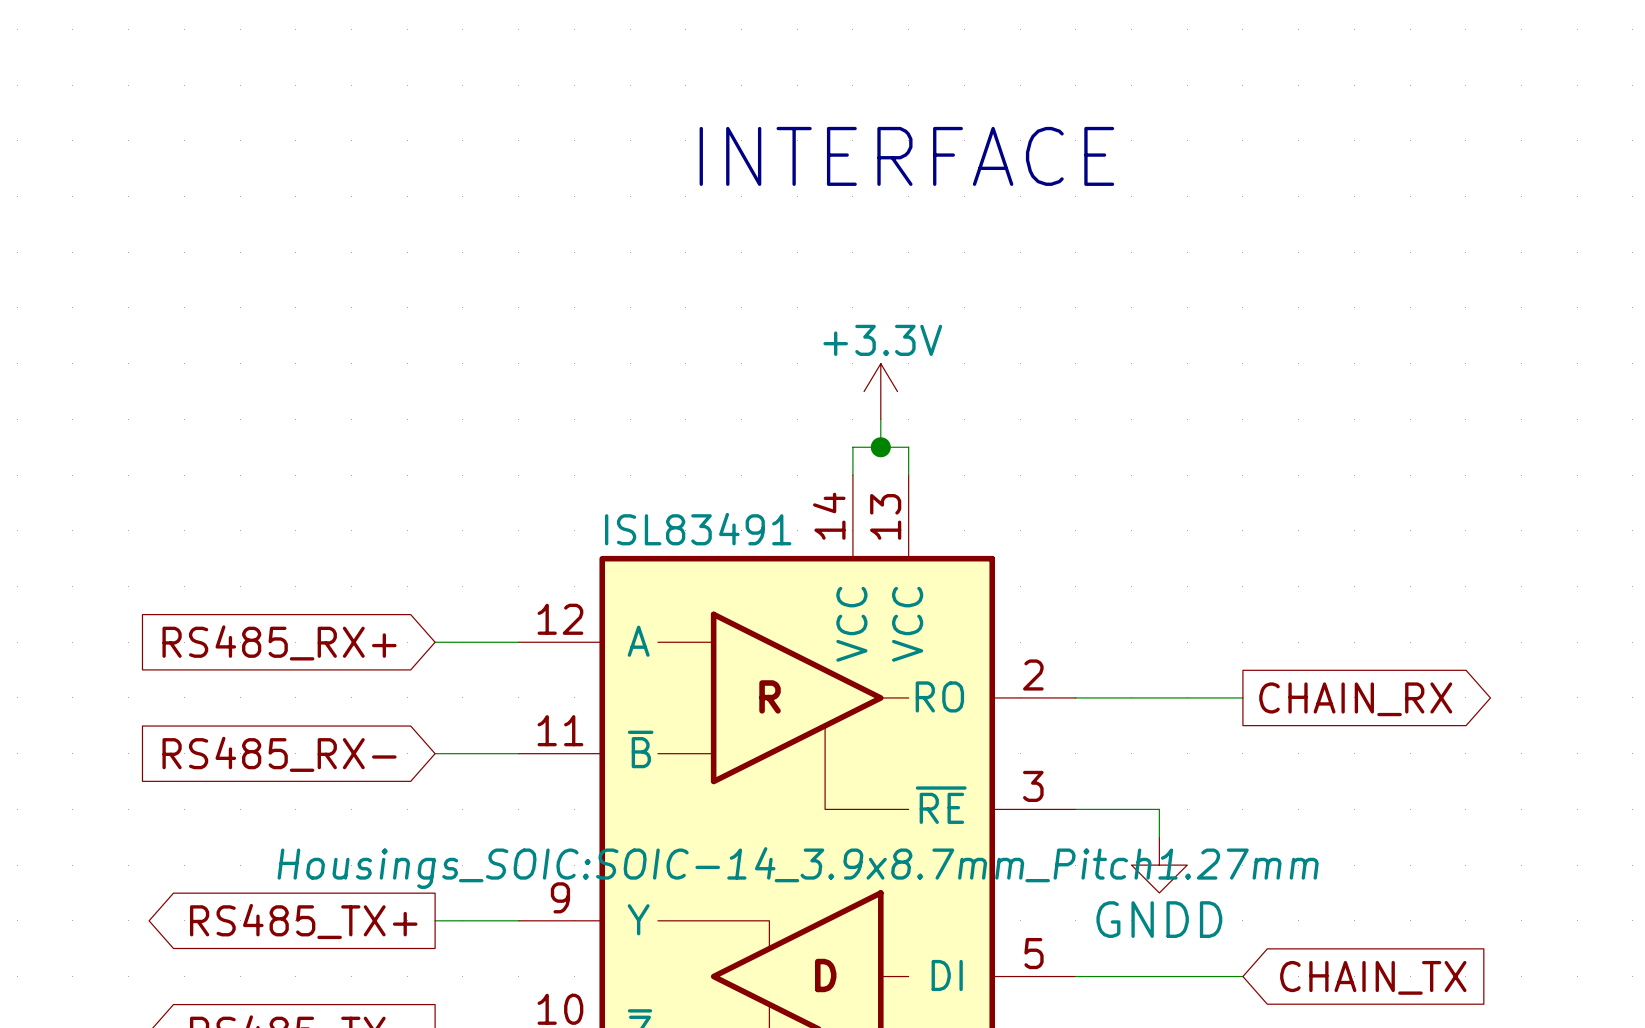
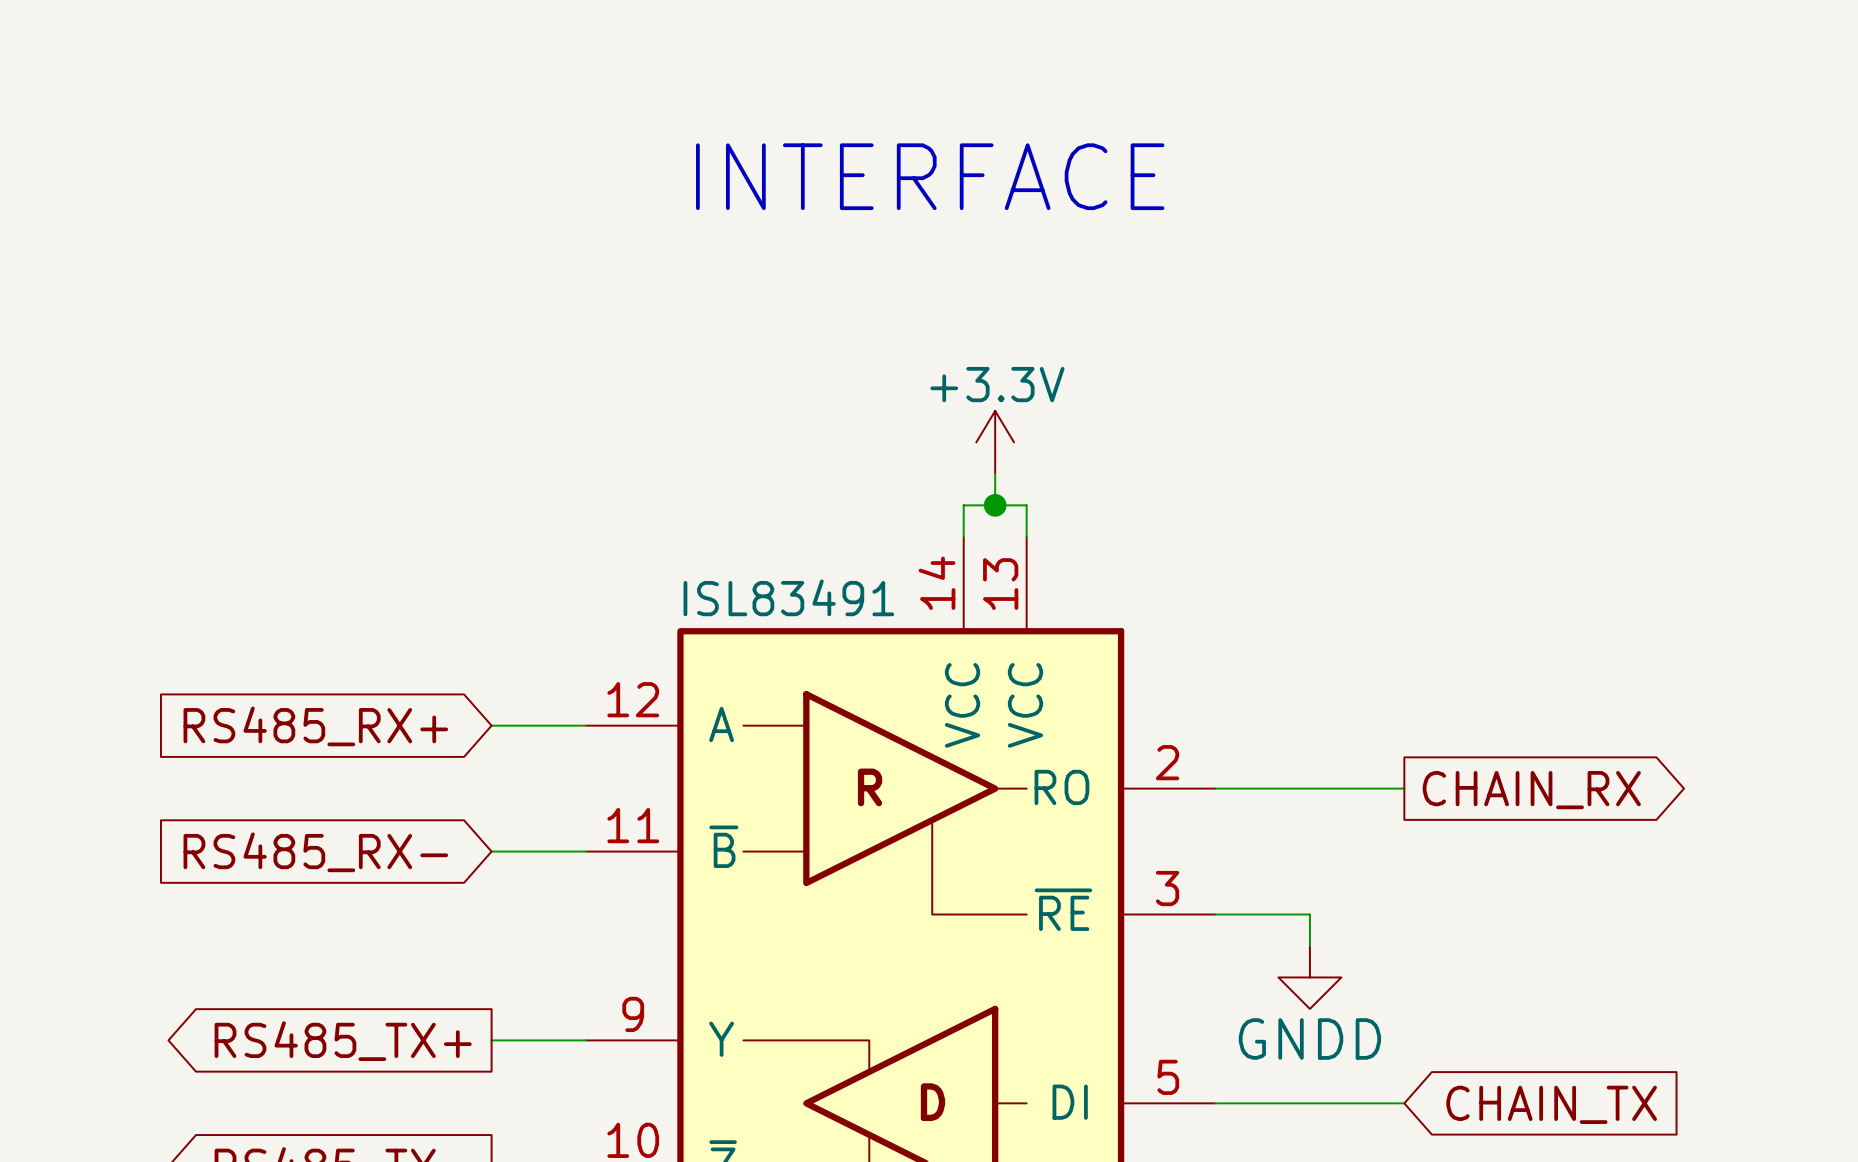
text position: INTERFACE (906, 156) -> INTERFACE (930, 176)
part text: Housings_SOIC:SOIC-14_3.9x8.7mm_Pitch1.27mm (798, 868) -> none

